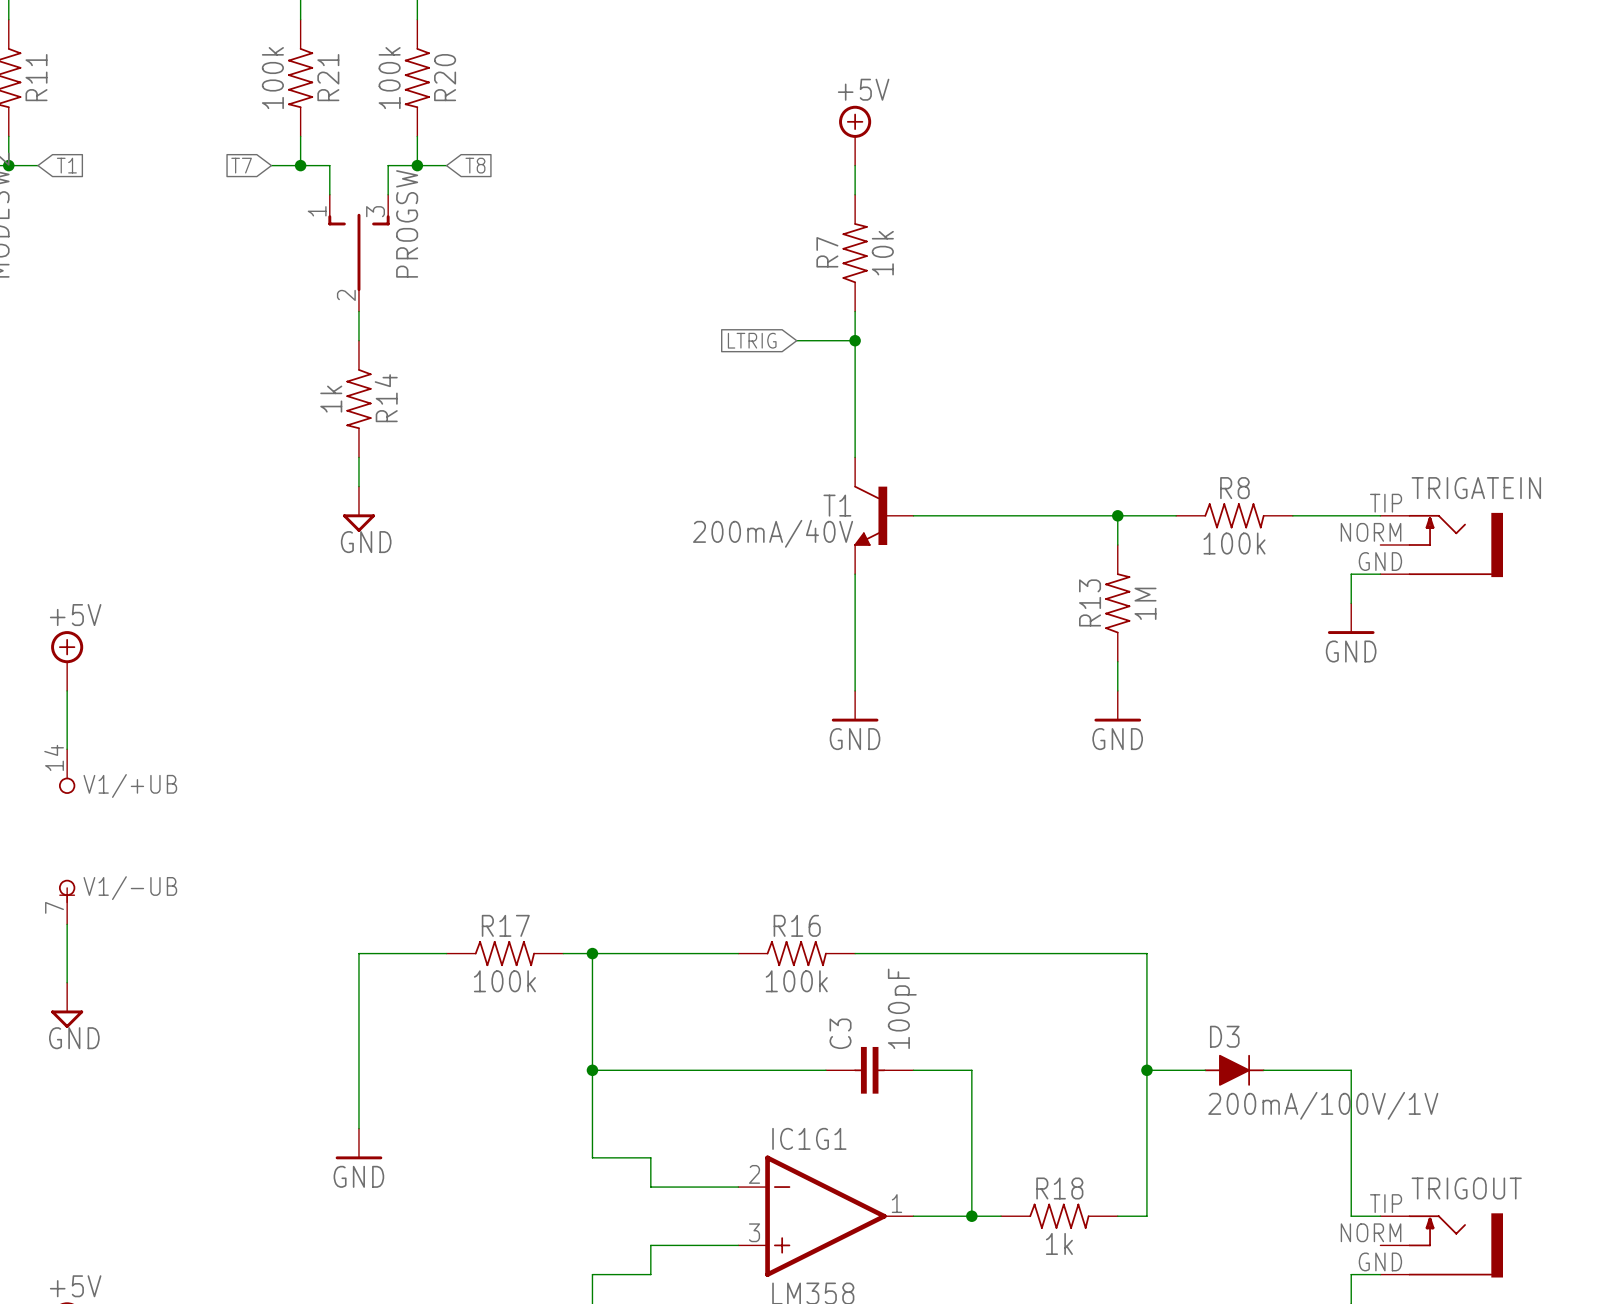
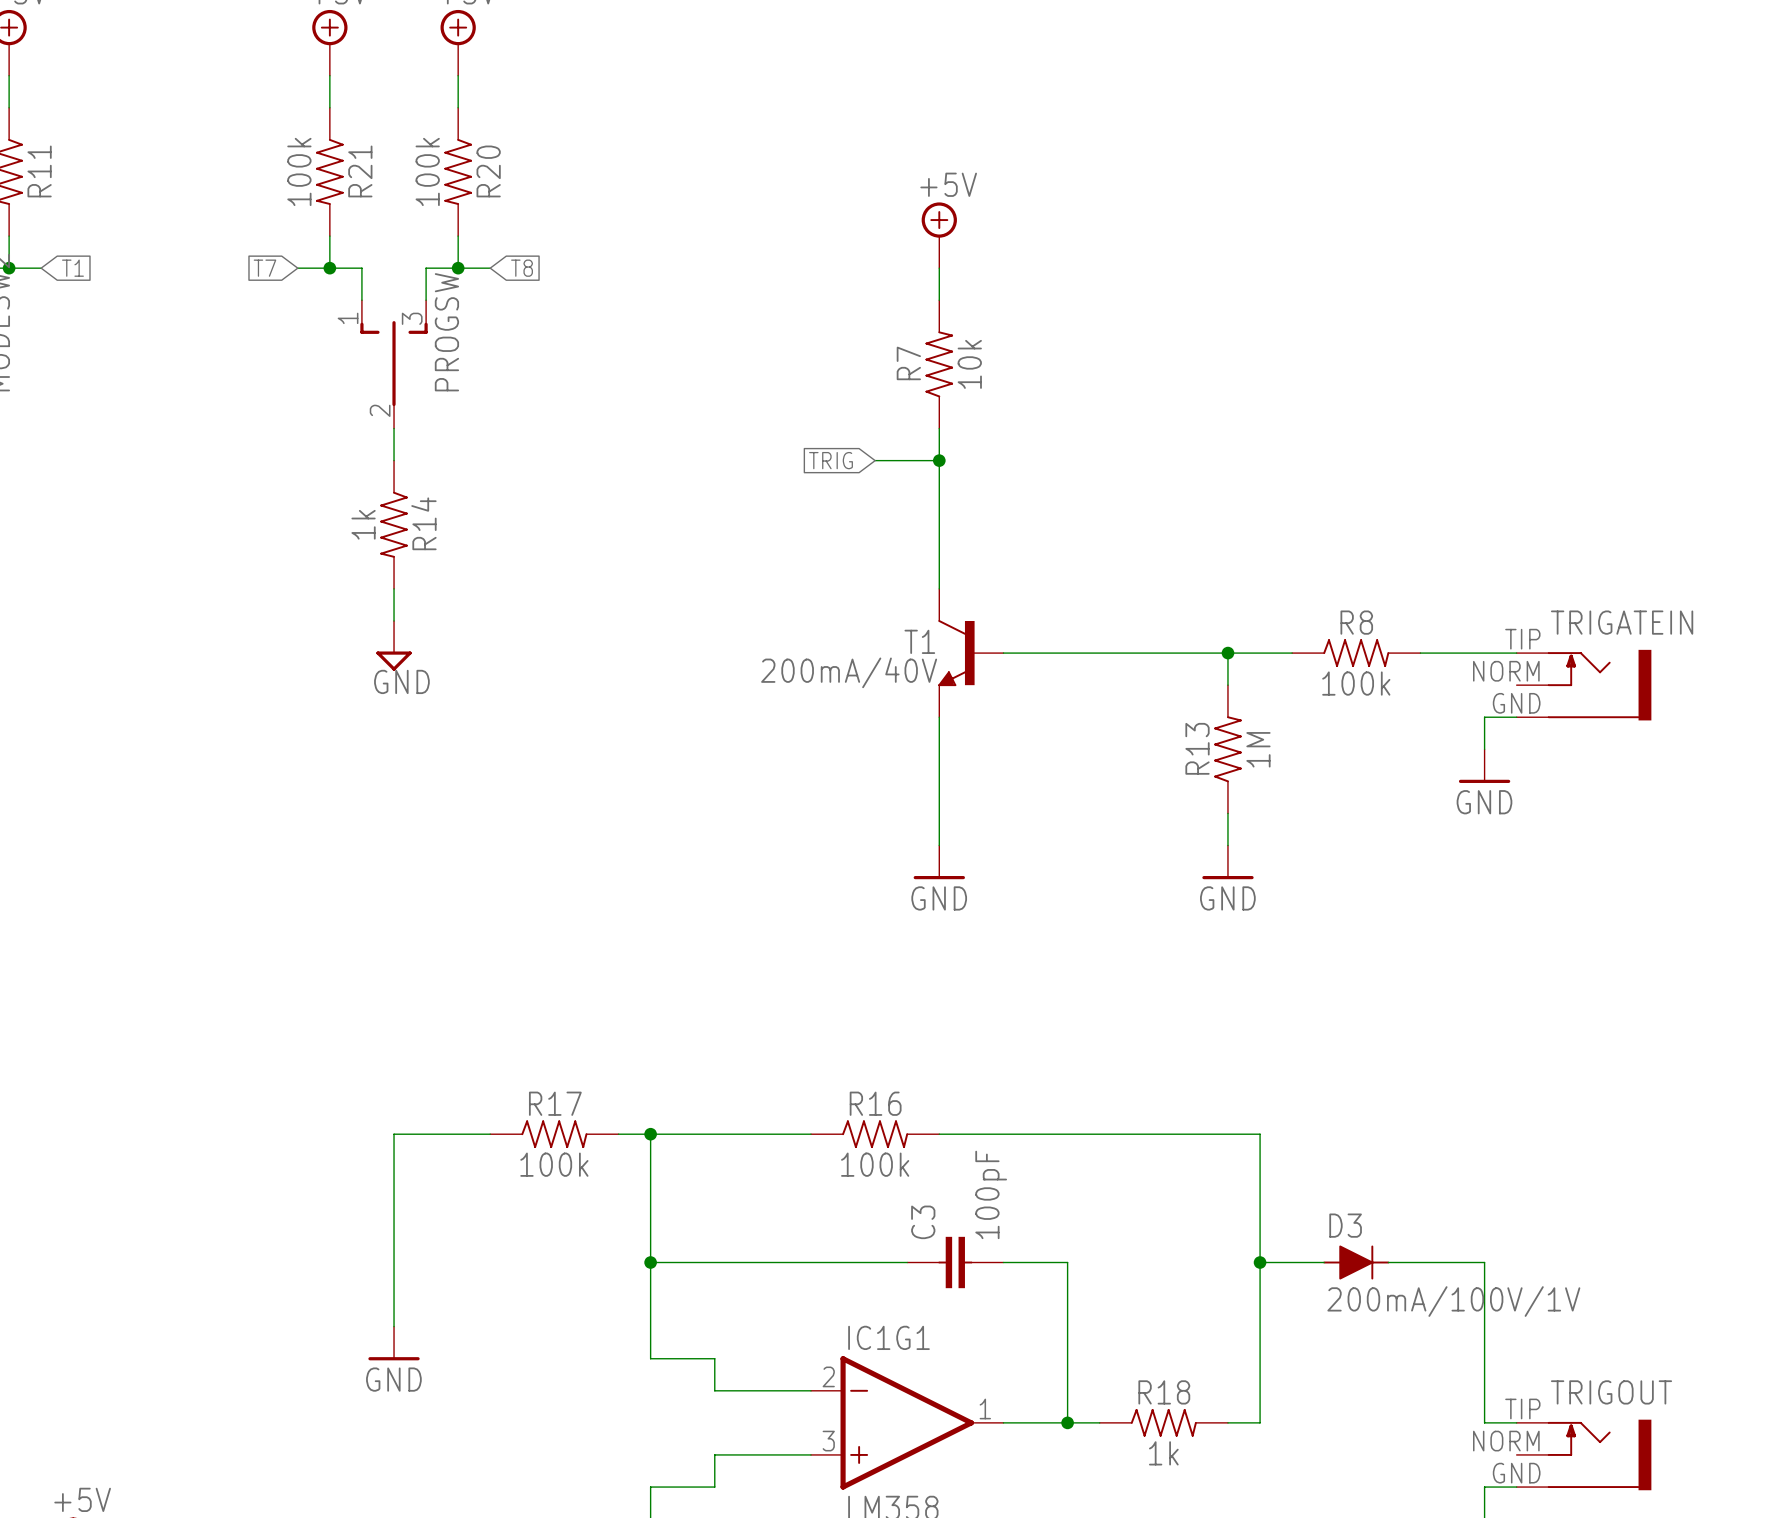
global label: LTRIG (752, 340) -> TRIG (831, 460)
power symbol: +5V (67, 661) -> none
wire: (67, 690) (67, 749) -> none
V1/+UB: (67, 771) -> none
V1/-UB: (67, 902) -> none
wire: (67, 924) (67, 982) -> none
power symbol: GND (67, 1005) -> none

